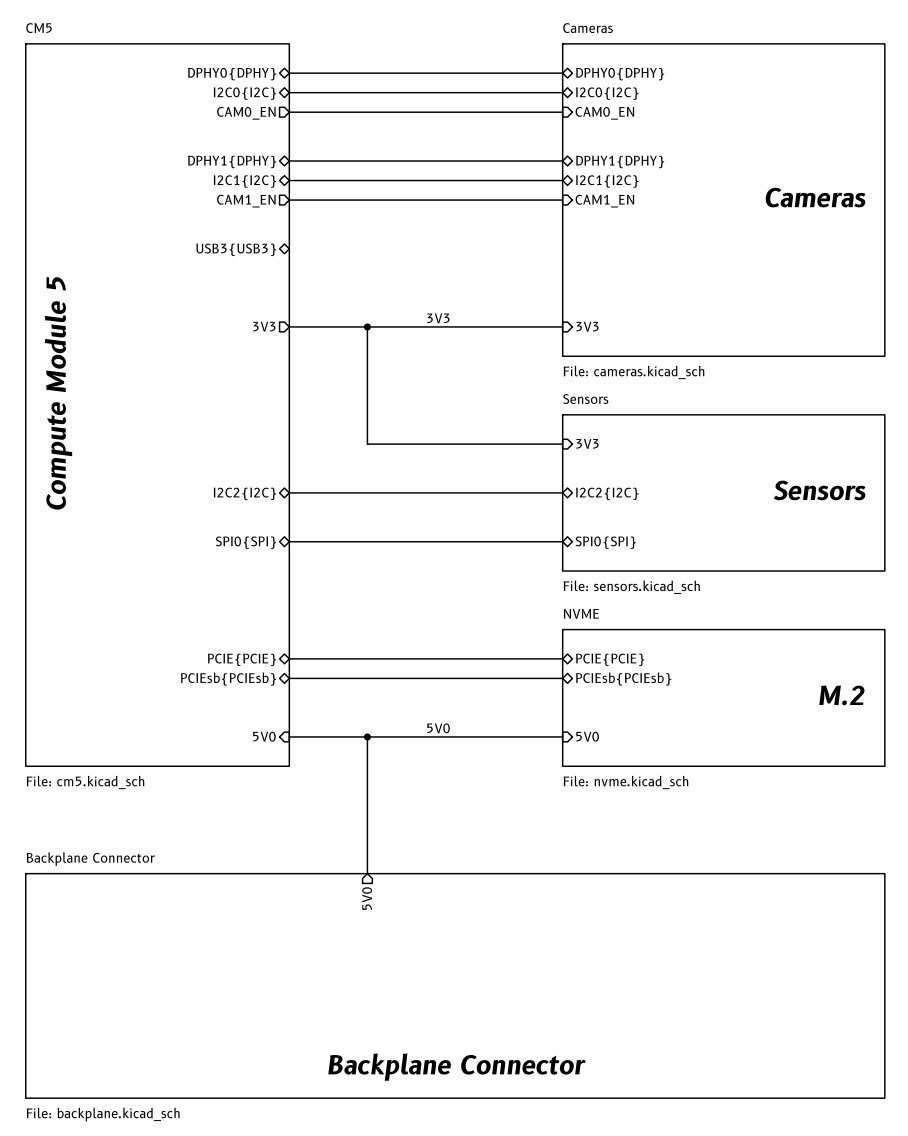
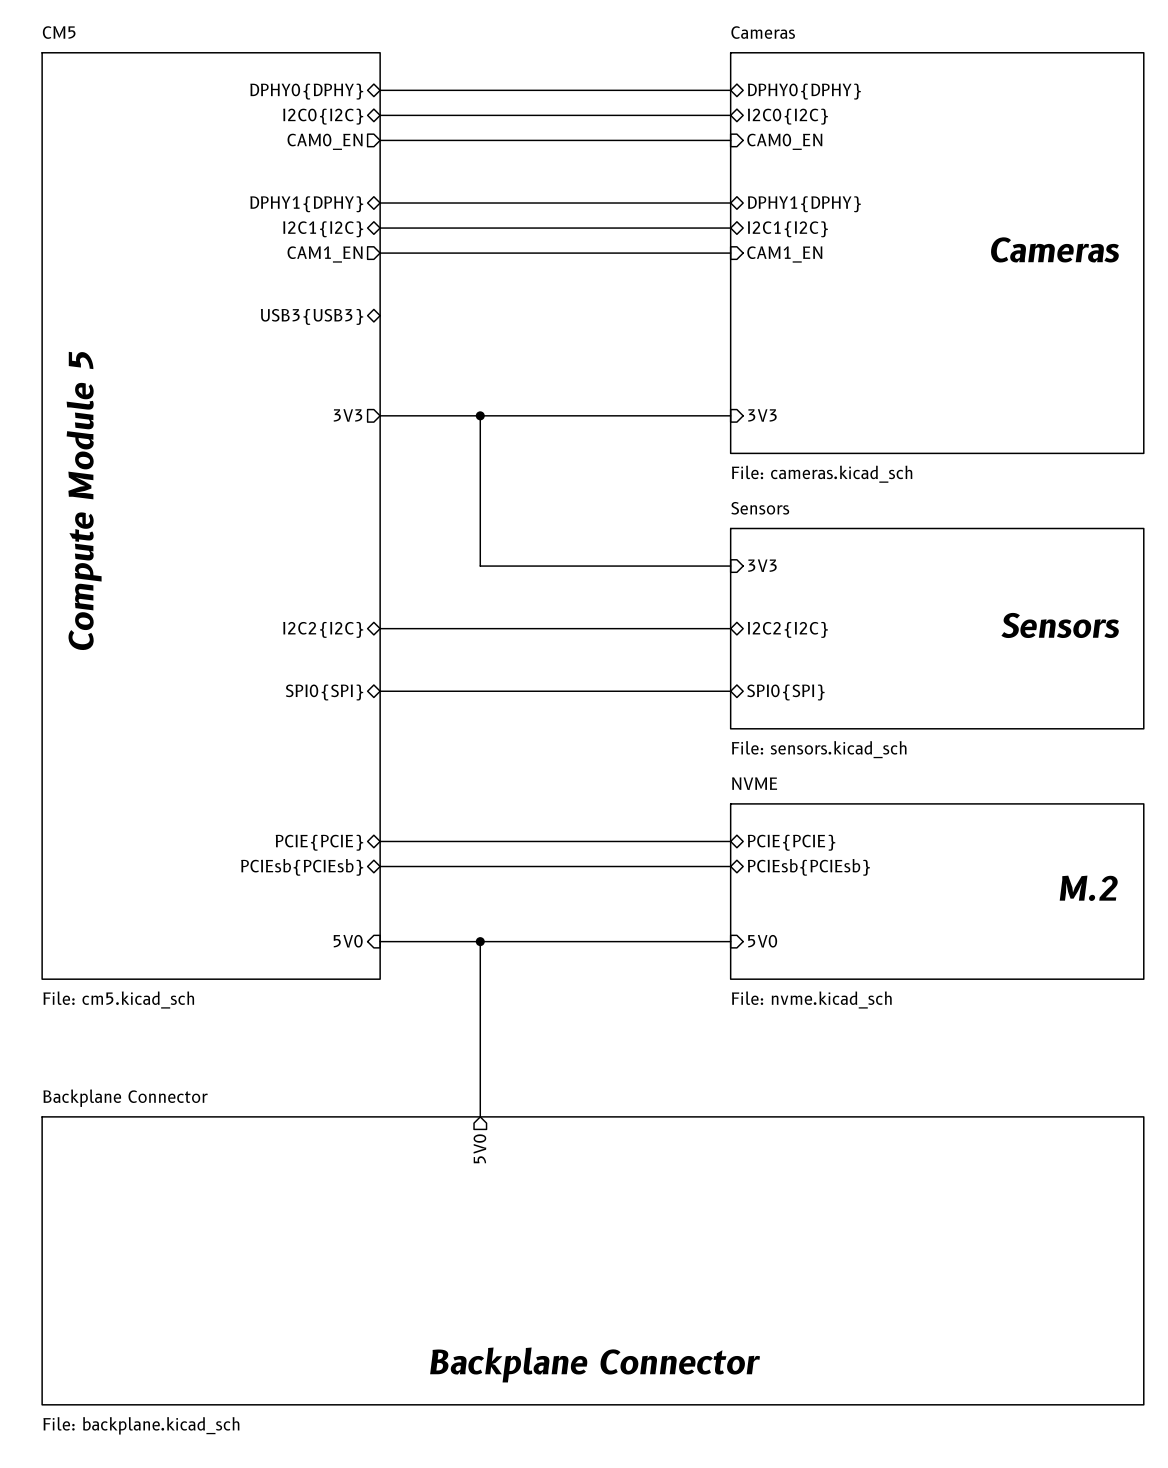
label: 3V3 (438, 318) -> none
label: 5V0 (438, 728) -> none

